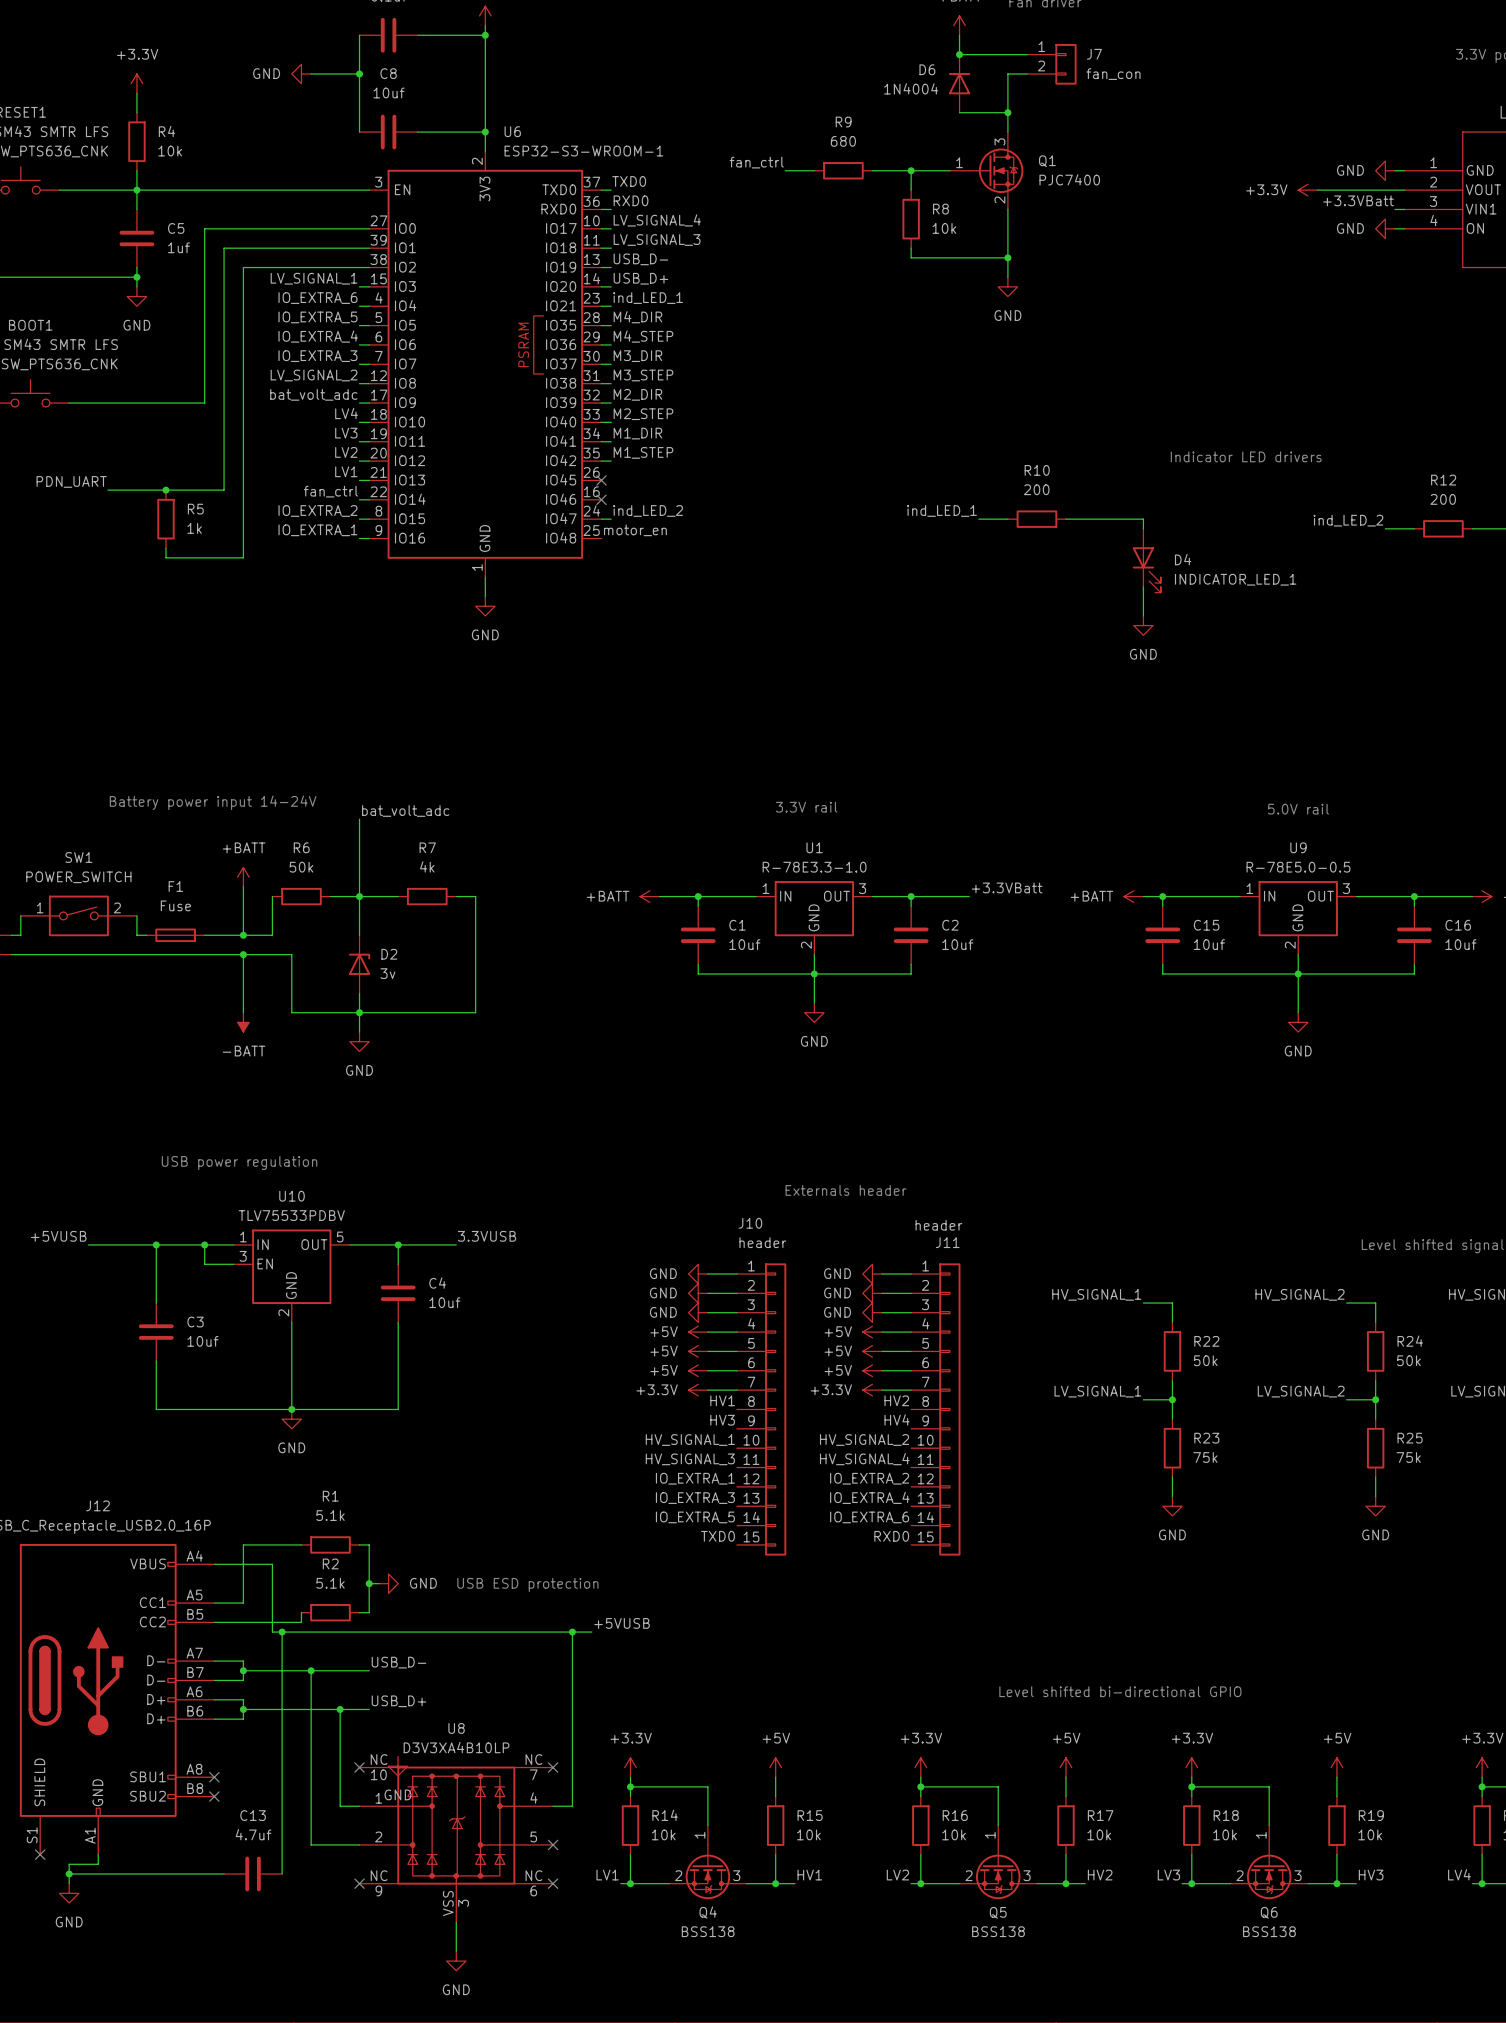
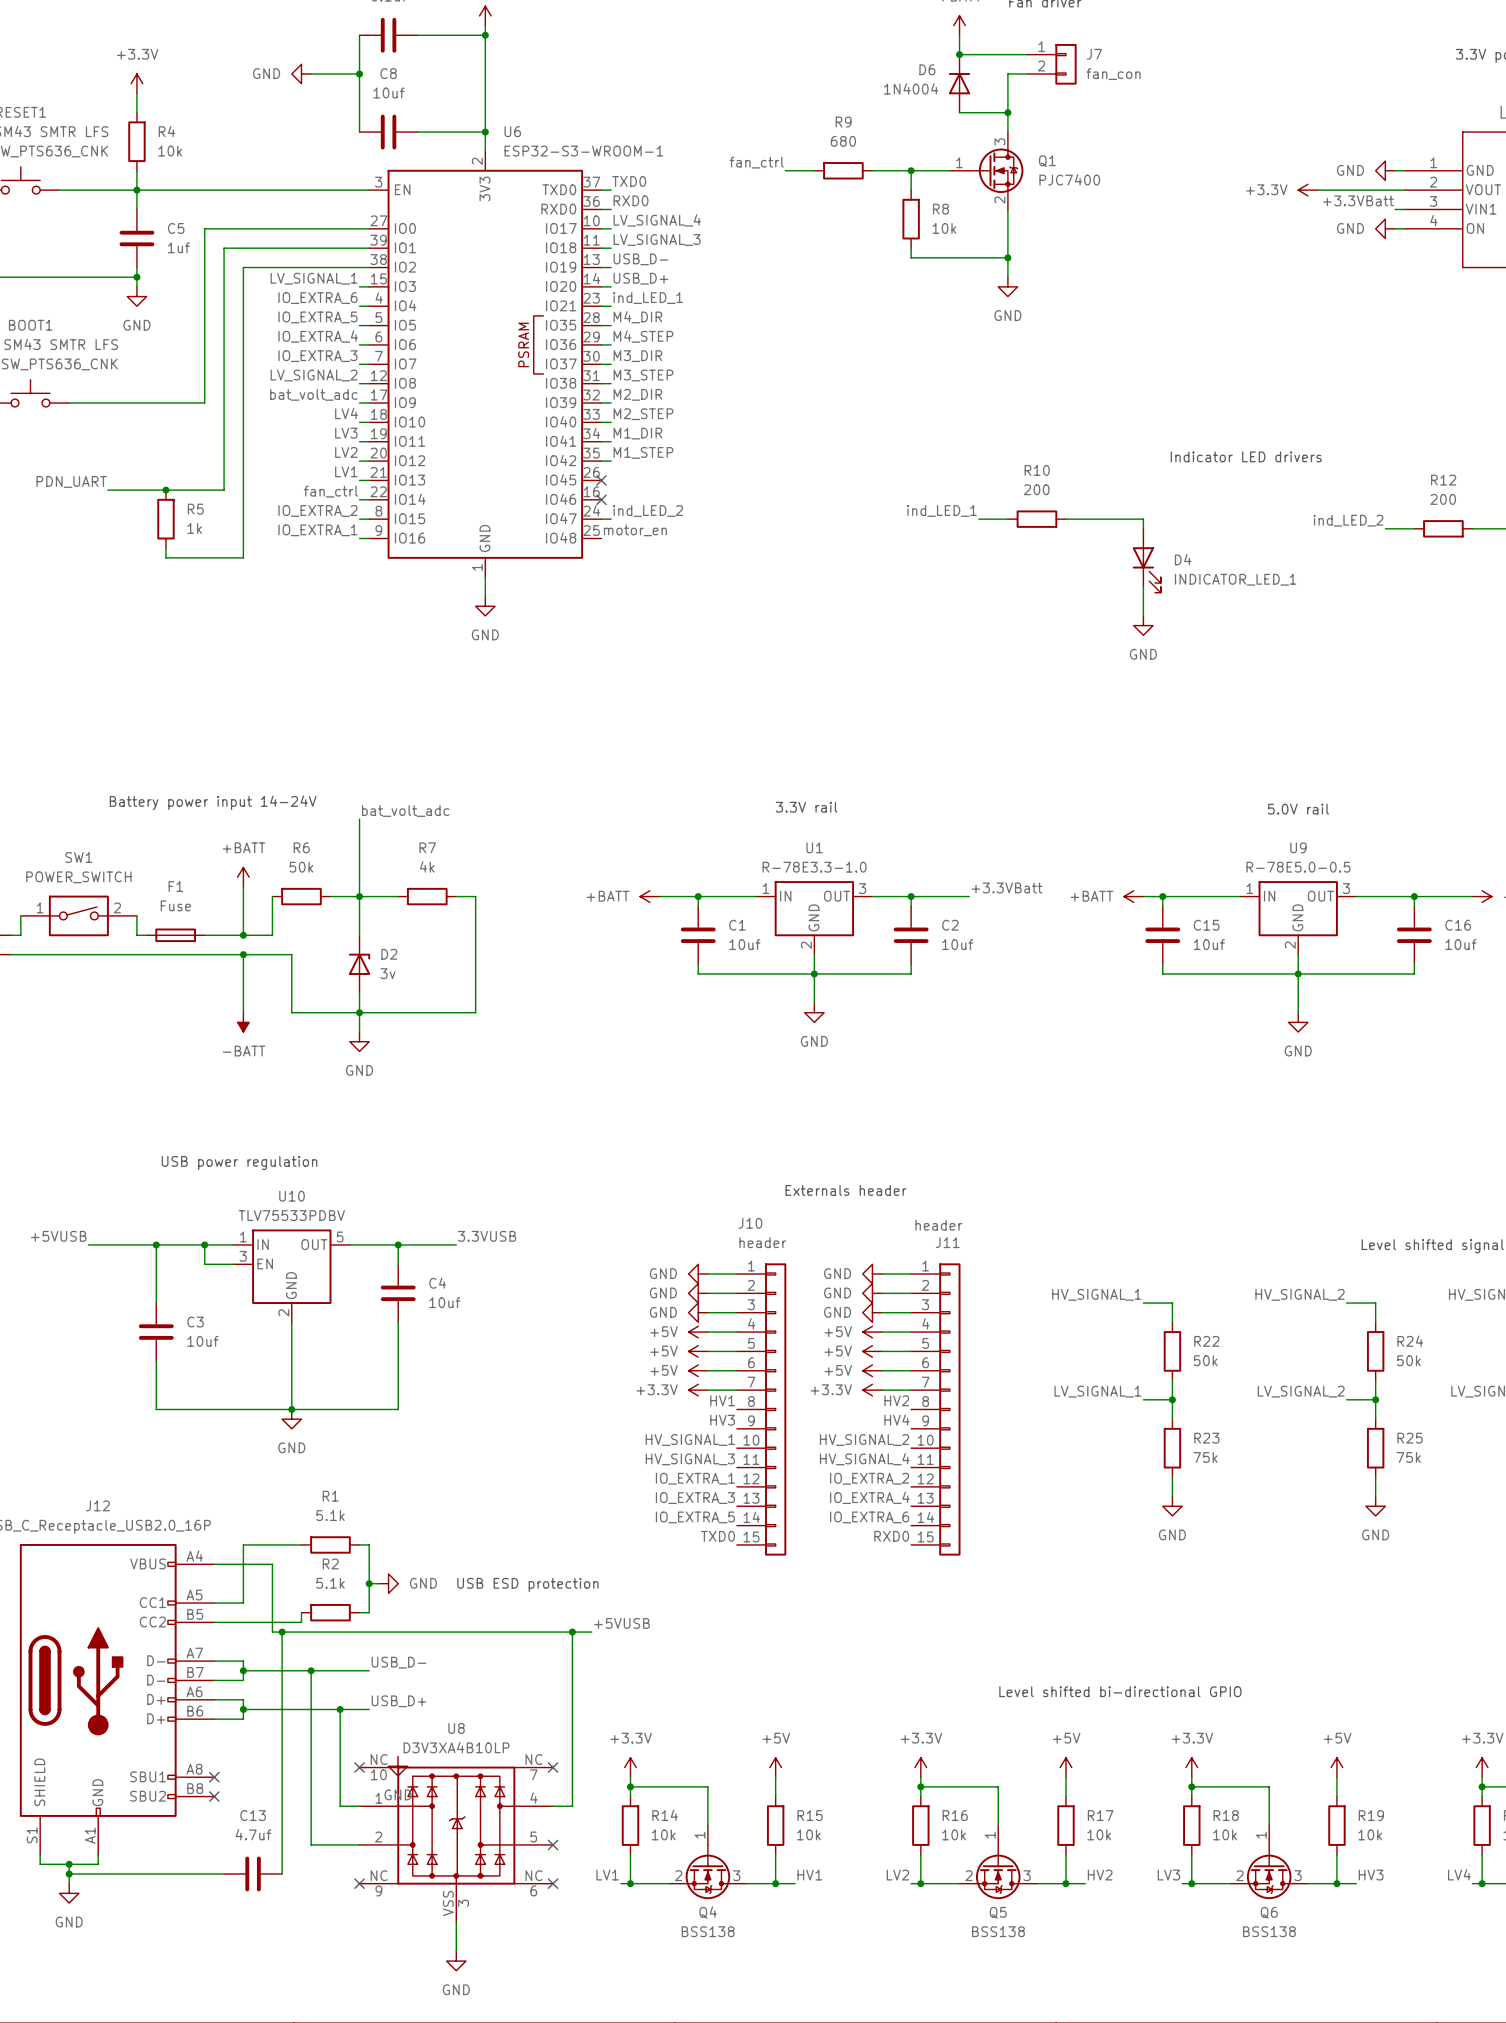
wire: none -> (40, 1854) (40, 1864) (69, 1864)
no-connect mark: (40, 1854) -> none
junction: none -> (69, 1864)

